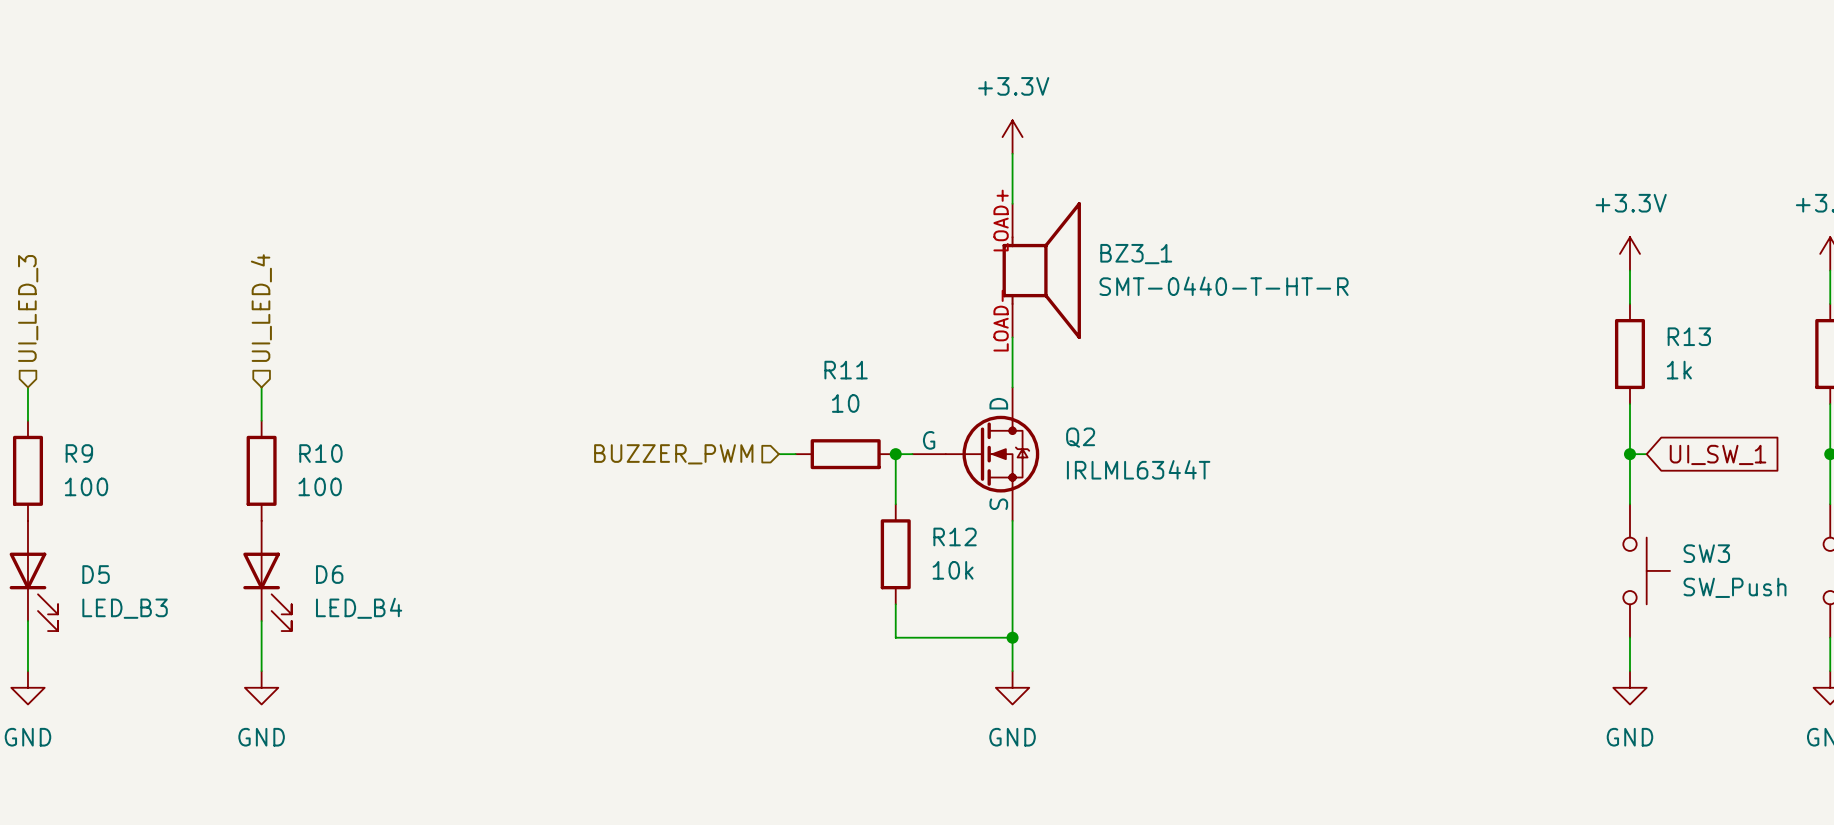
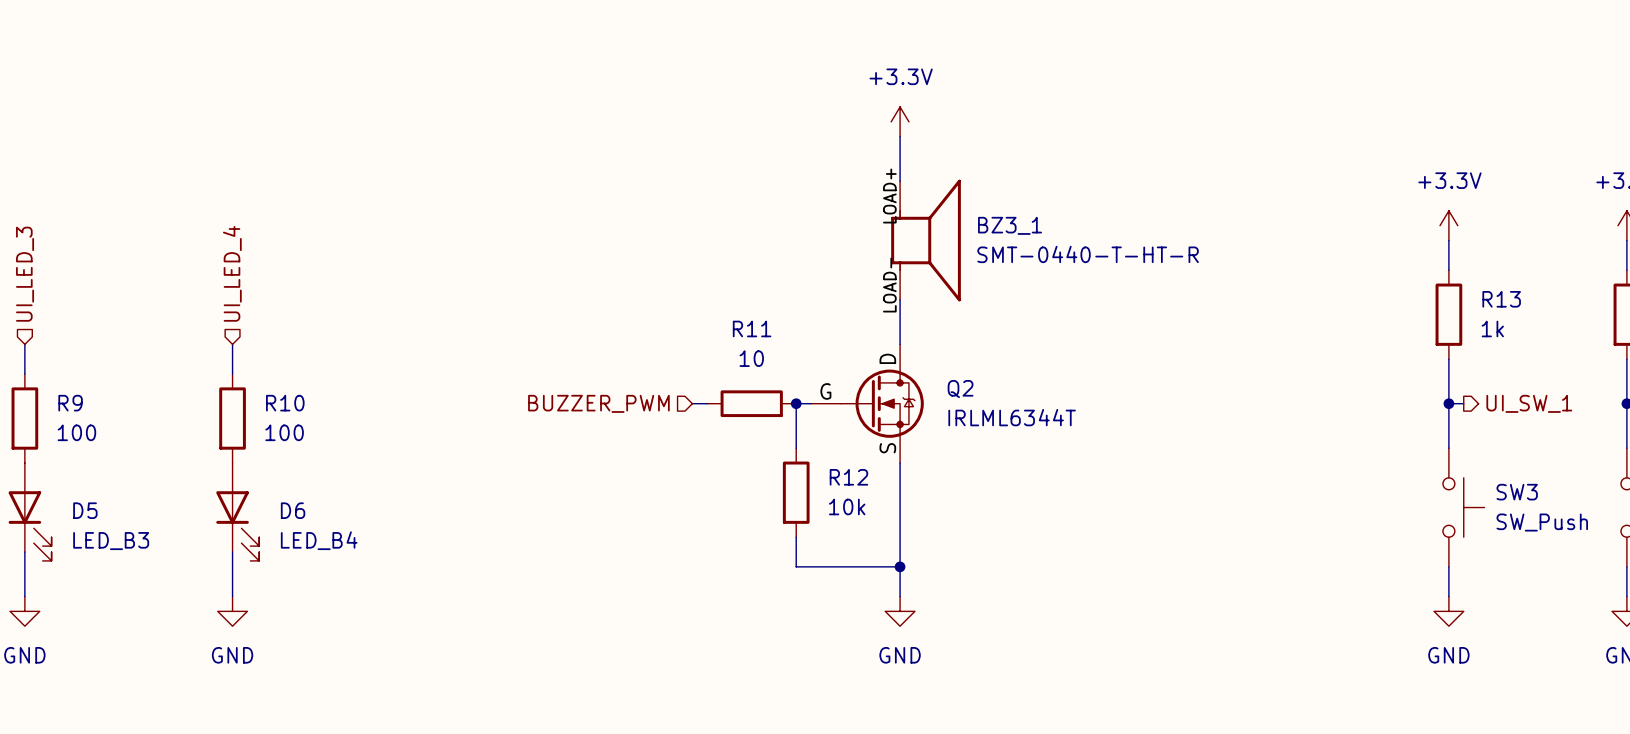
global label: UI_SW_1 (1718, 454) -> none
hierarchical label: none -> UI_SW_1 (1529, 403)

